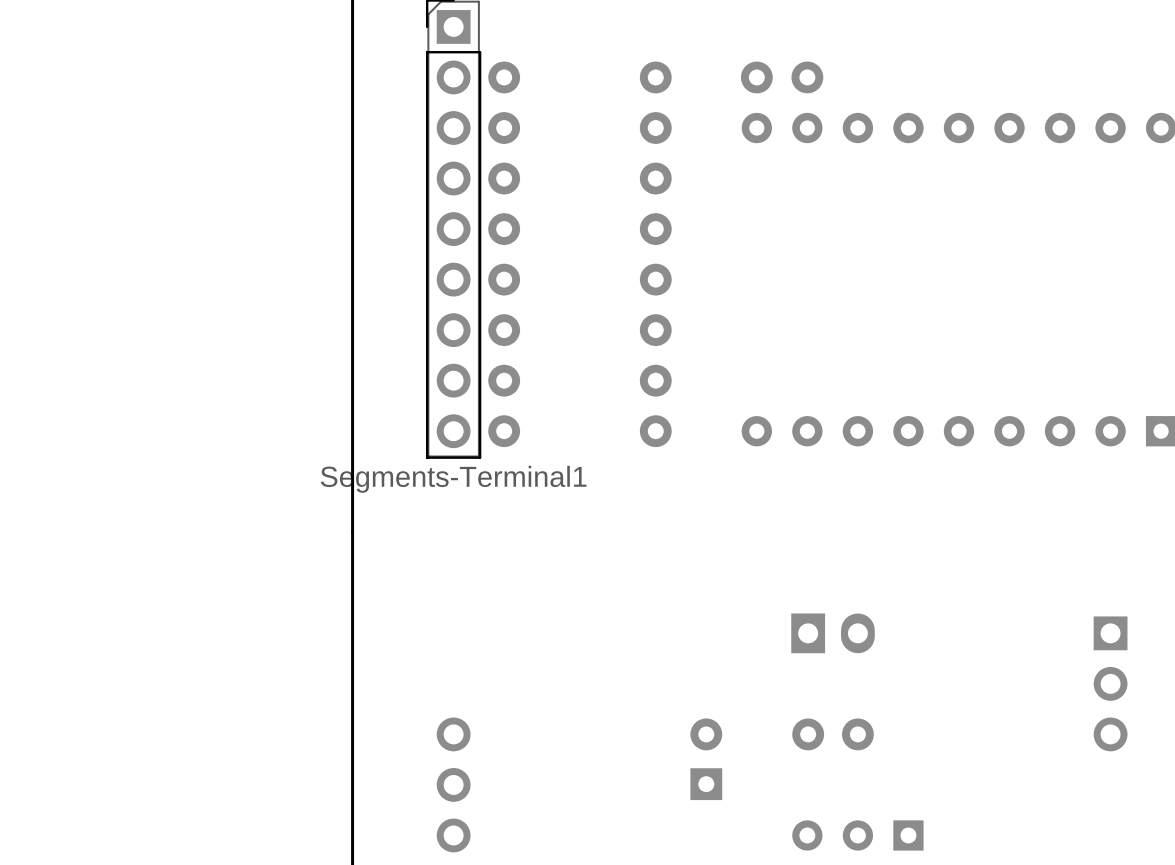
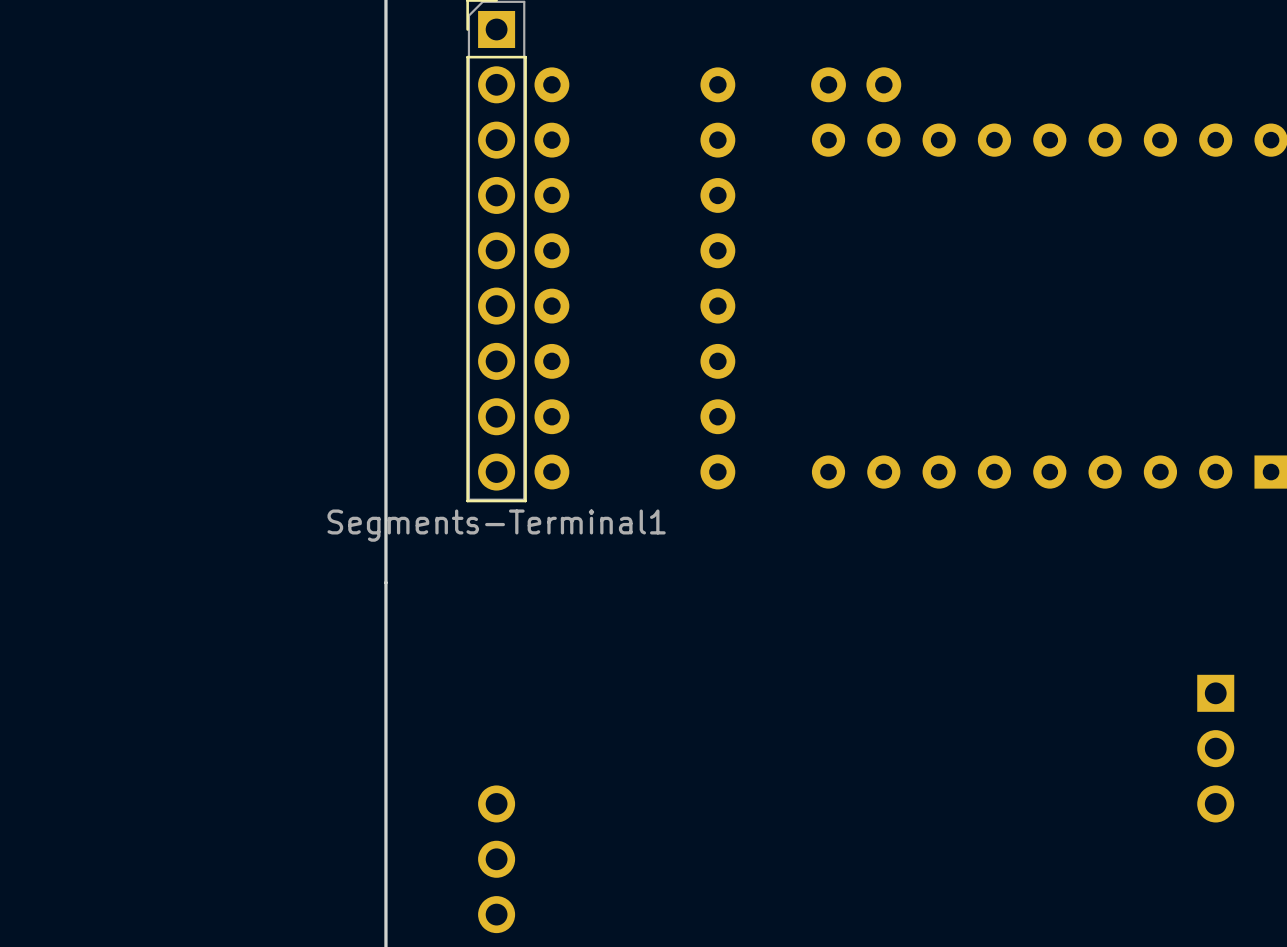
part: (833, 633) -> none
part: (833, 734) -> none
part: (706, 759) -> none
part: (857, 835) -> none

